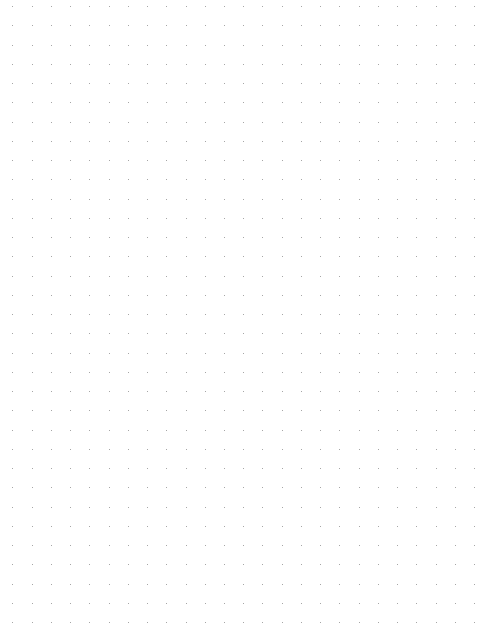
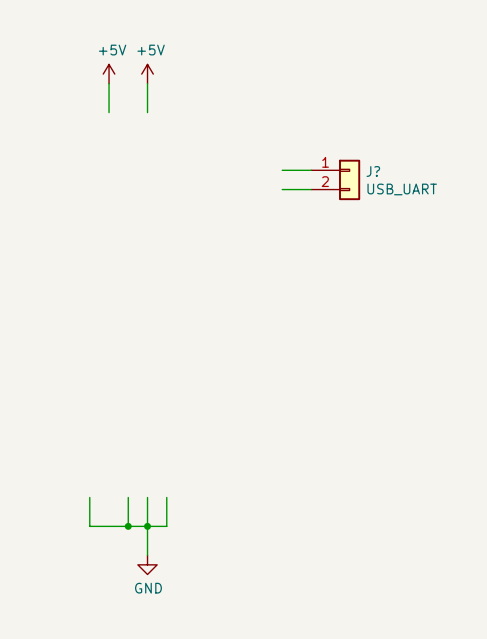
power symbol: none -> +5V (109, 74)
power symbol: none -> +5V (147, 74)
wire: none -> (109, 83) (109, 112)
wire: none -> (147, 83) (147, 112)
wire: none -> (282, 170) (311, 170)
J?: none -> USB_UART (335, 179)
wire: none -> (282, 189) (311, 189)
wire: none -> (89, 497) (89, 526) (166, 526) (166, 497)
wire: none -> (128, 497) (128, 526)
wire: none -> (147, 497) (147, 555)
junction: none -> (128, 526)
junction: none -> (147, 526)
power symbol: none -> GND (147, 564)

